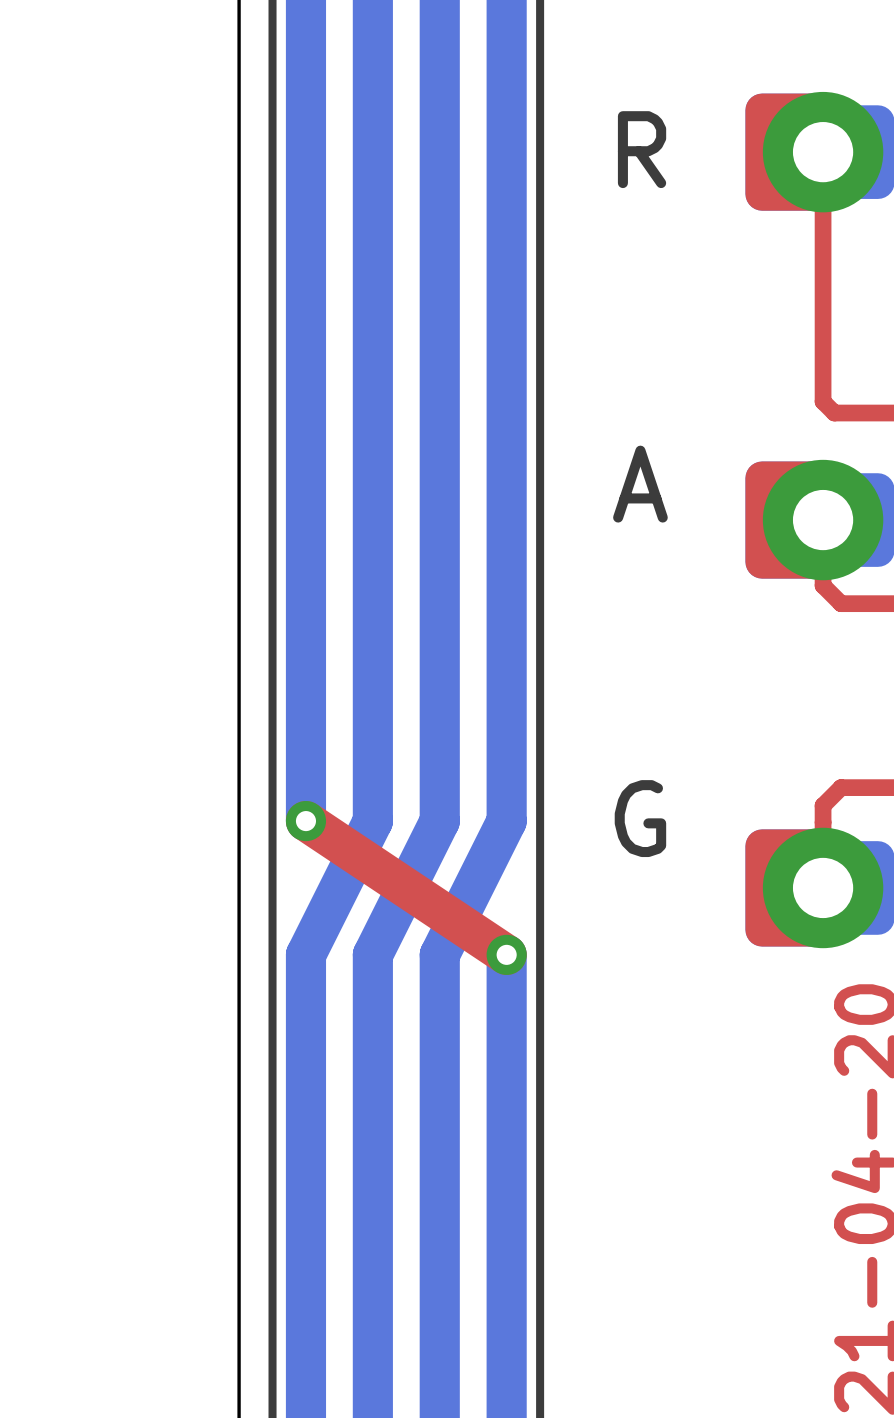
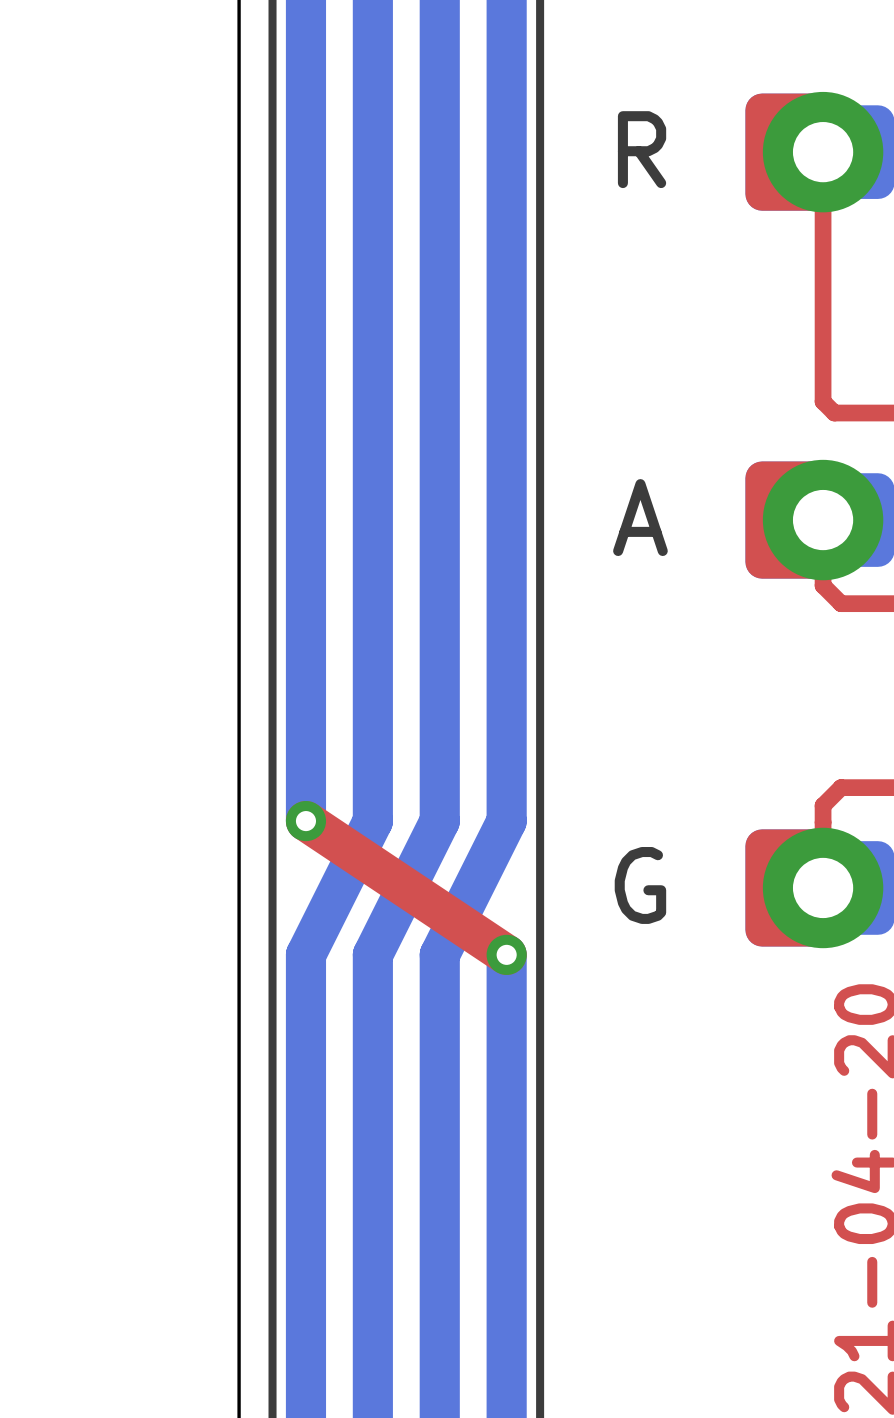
text position: A (640, 484) -> A (640, 517)
text position: G (640, 818) -> G (640, 885)

